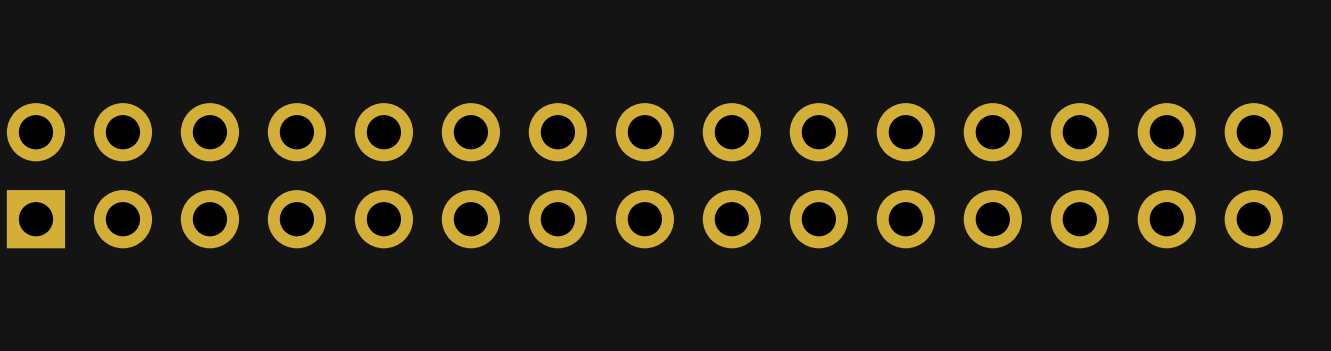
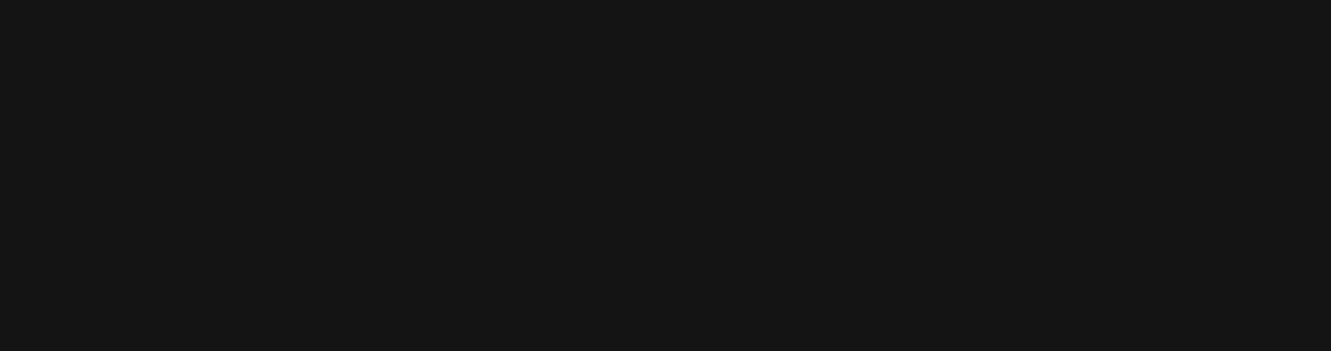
part: (644, 175) -> none

